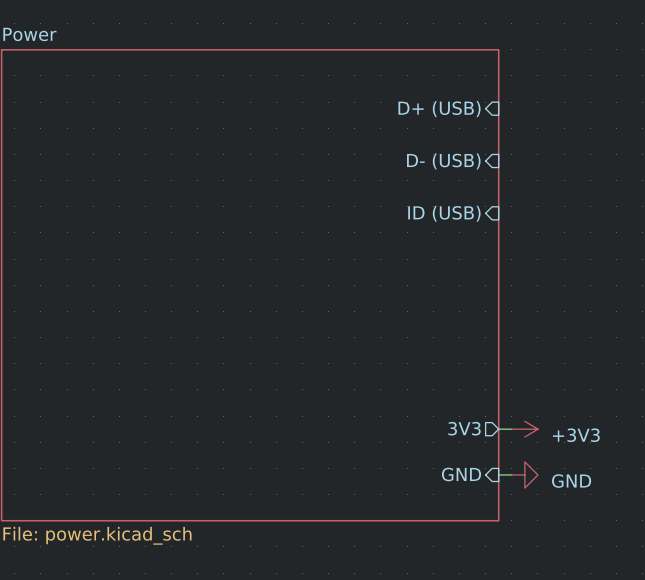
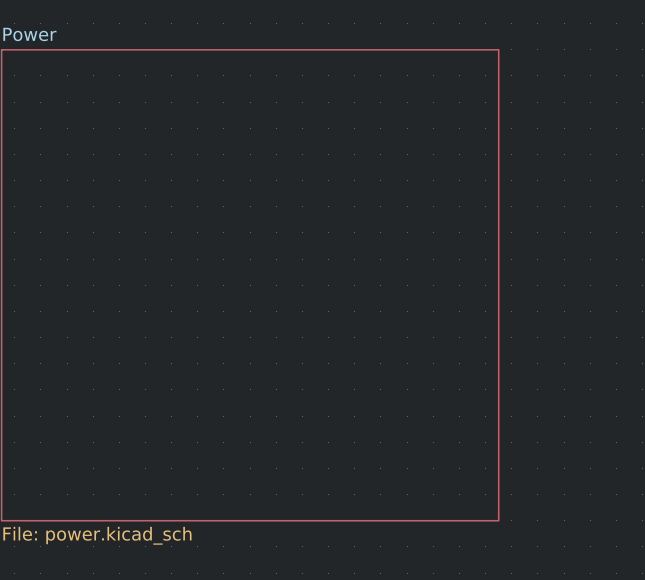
sheet pin: D+ (USB) (439, 109) -> none
sheet pin: D- (USB) (443, 161) -> none
sheet pin: ID (USB) (444, 213) -> none
sheet pin: 3V3 (464, 428) -> none
wire: (498, 429) (511, 429) -> none
power symbol: +3V3 (524, 429) -> none
sheet pin: GND (461, 474) -> none
wire: (498, 474) (511, 474) -> none
power symbol: GND (524, 474) -> none

